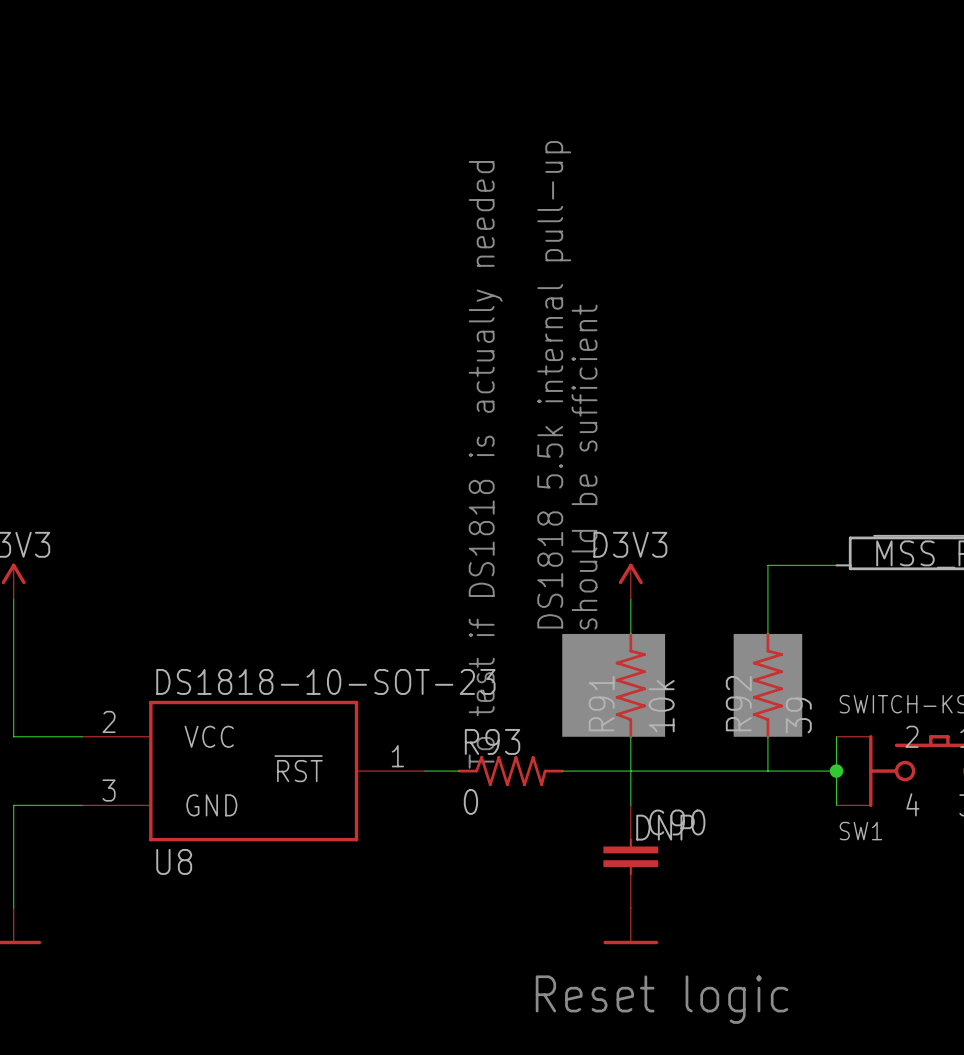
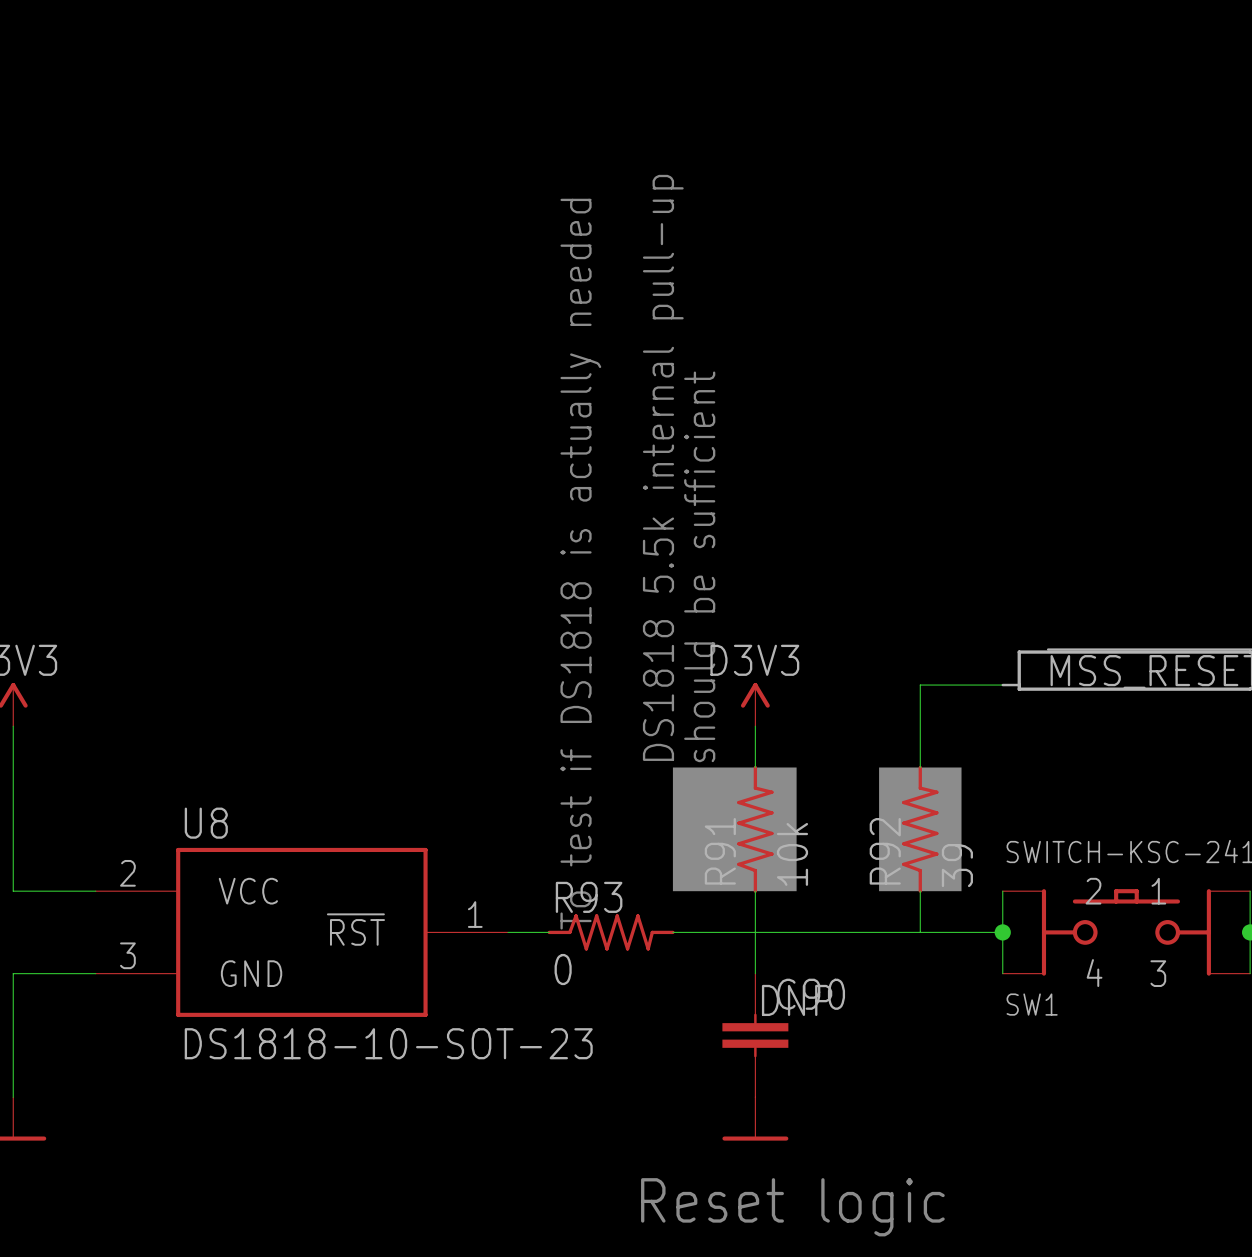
U8 value position: DS1818-10-SOT-23 (325, 681) -> DS1818-10-SOT-23 (388, 1043)
U8 name position: U8 (174, 861) -> U8 (206, 823)

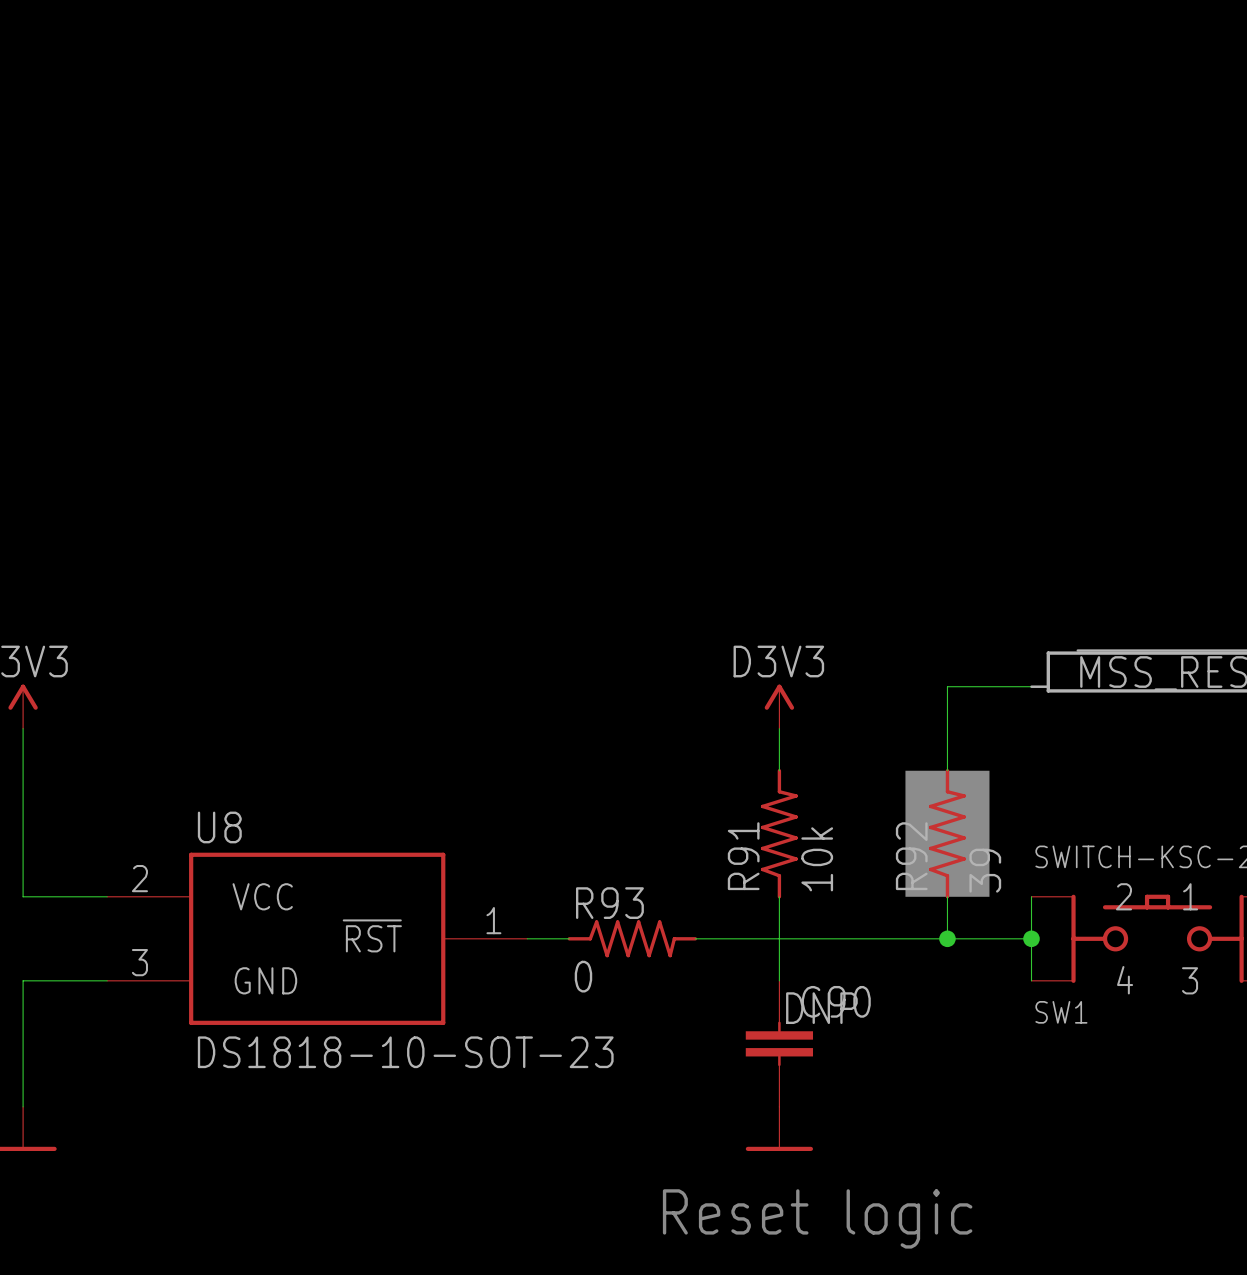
text: DS1818 5.5k internal pull-up (663, 467) -> none
text: To test if DS1818 is actually needed (580, 564) -> none
text: should be sufficient (699, 566) -> none
drawing: [672, 767, 797, 892] -> none
junction: none -> (947, 938)

